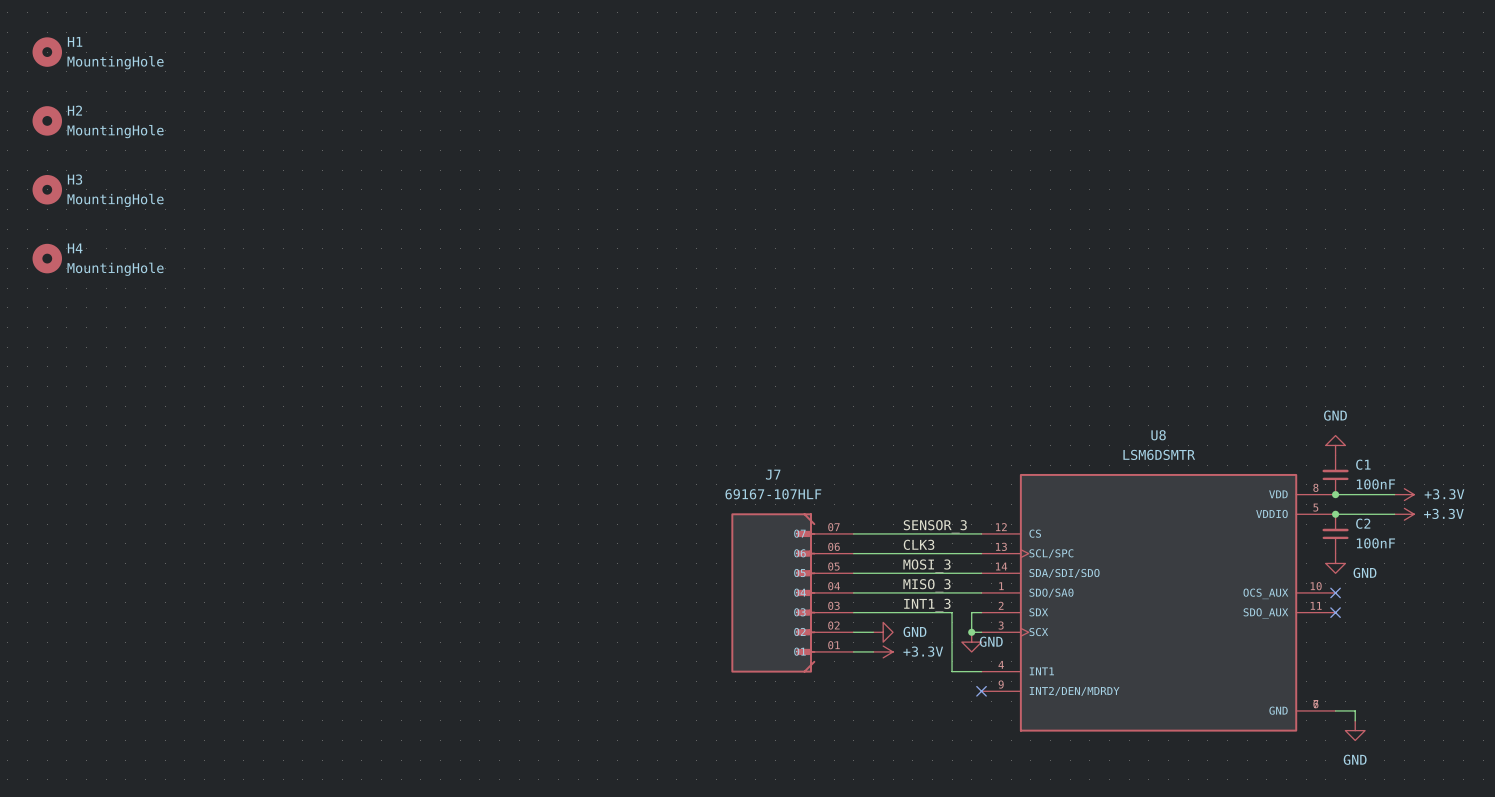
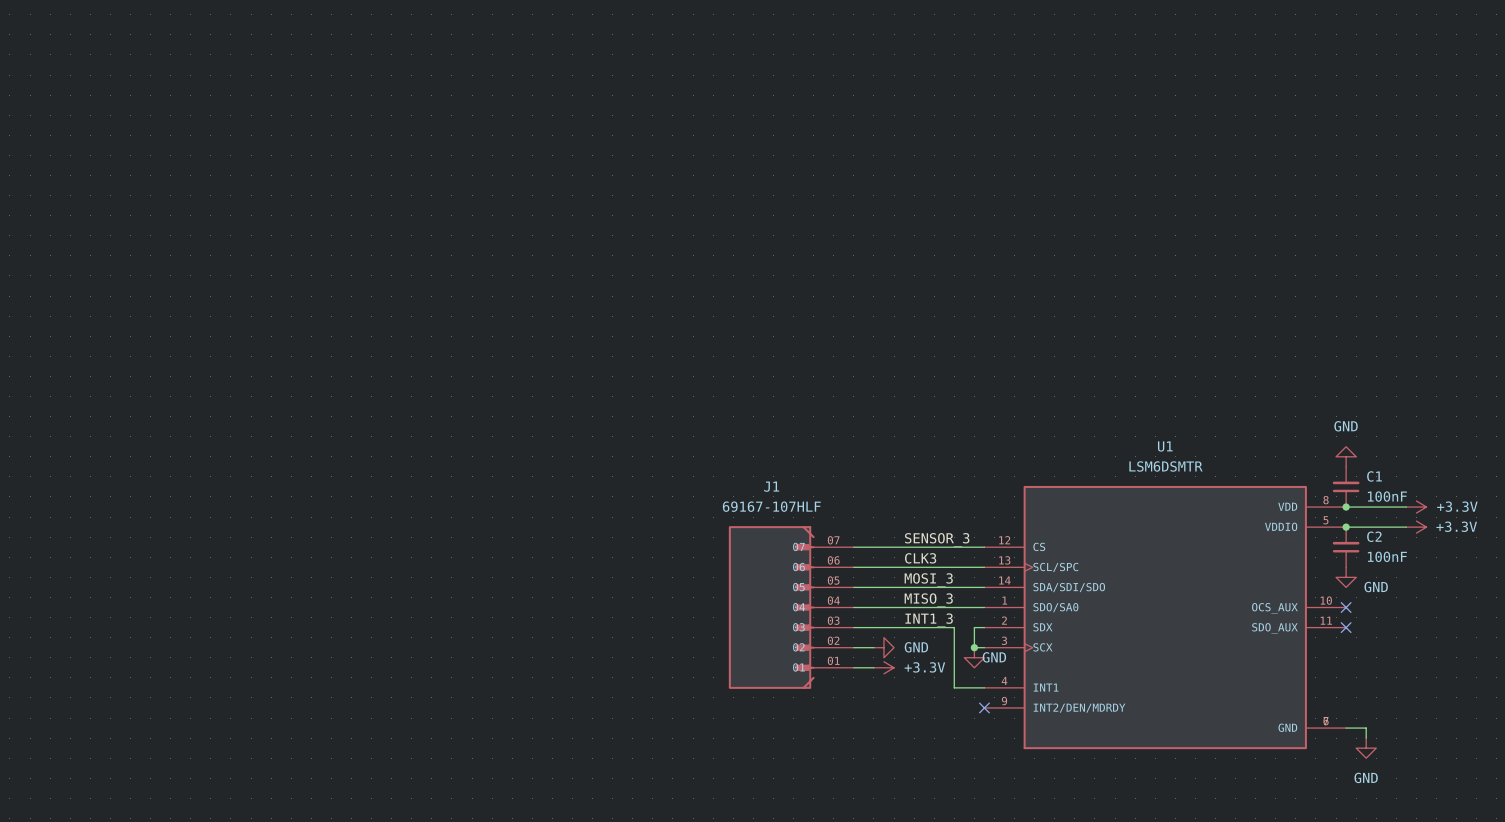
H1: MountingHole (47, 52) -> none
H2: MountingHole (47, 120) -> none
H3: MountingHole (47, 189) -> none
H4: MountingHole (47, 258) -> none
U8 name: U8 (1158, 435) -> U1 (1165, 446)
J7 name: J7 (773, 474) -> J1 (771, 486)

